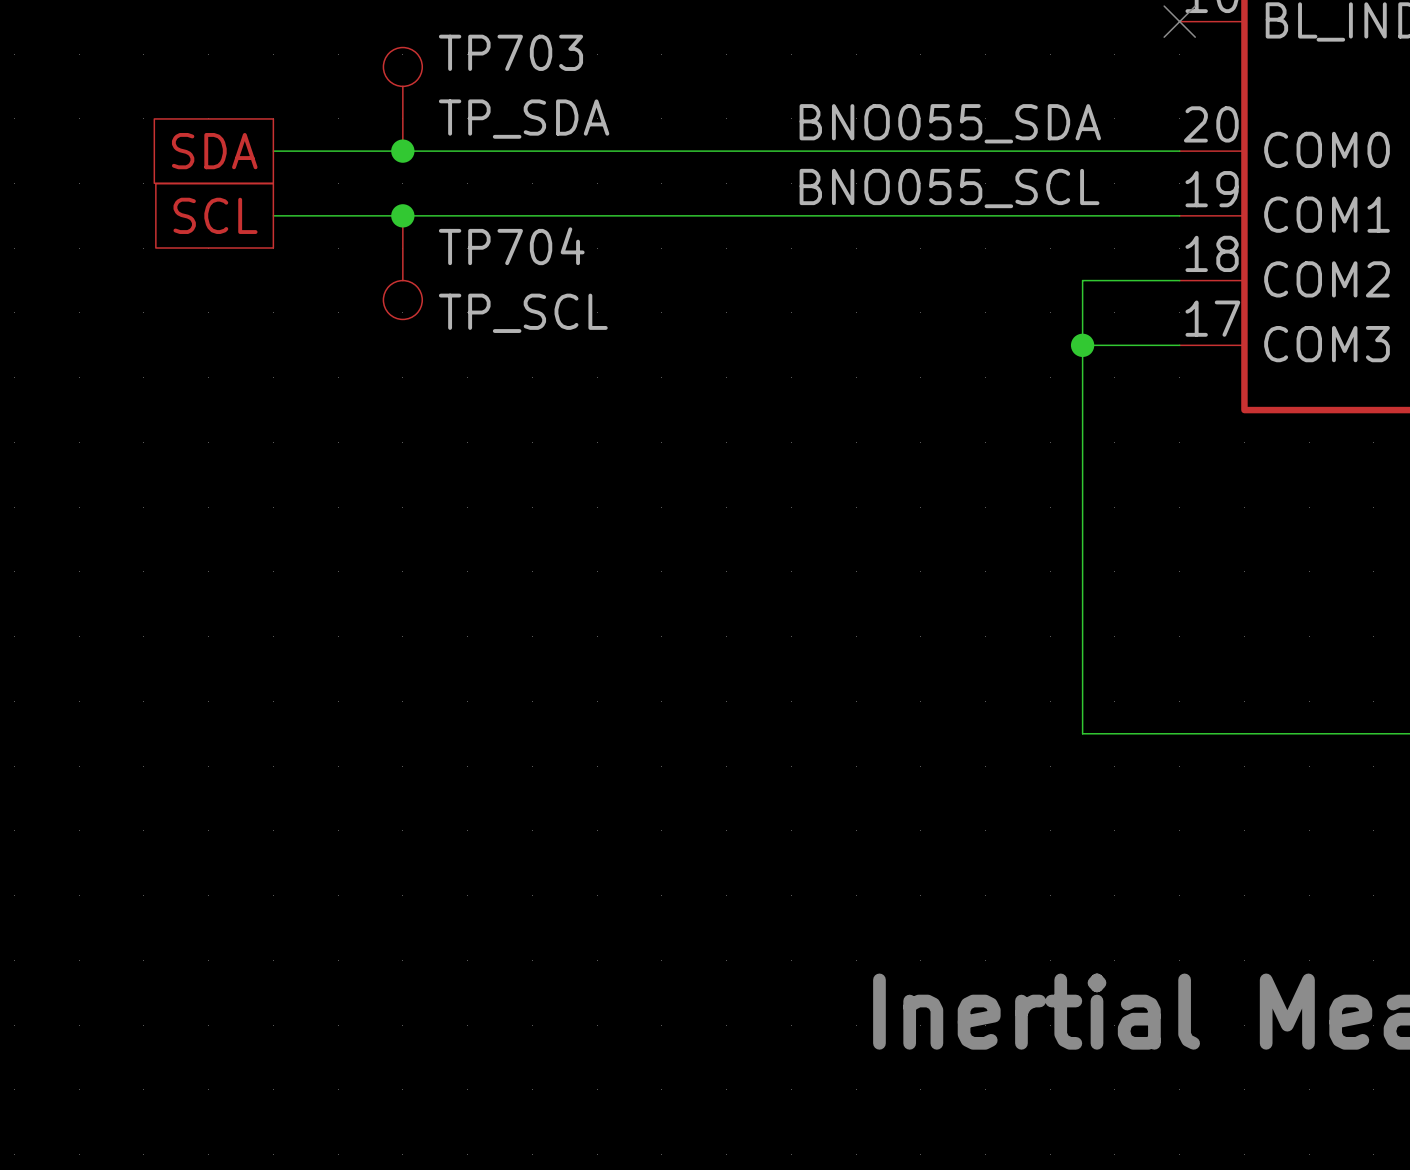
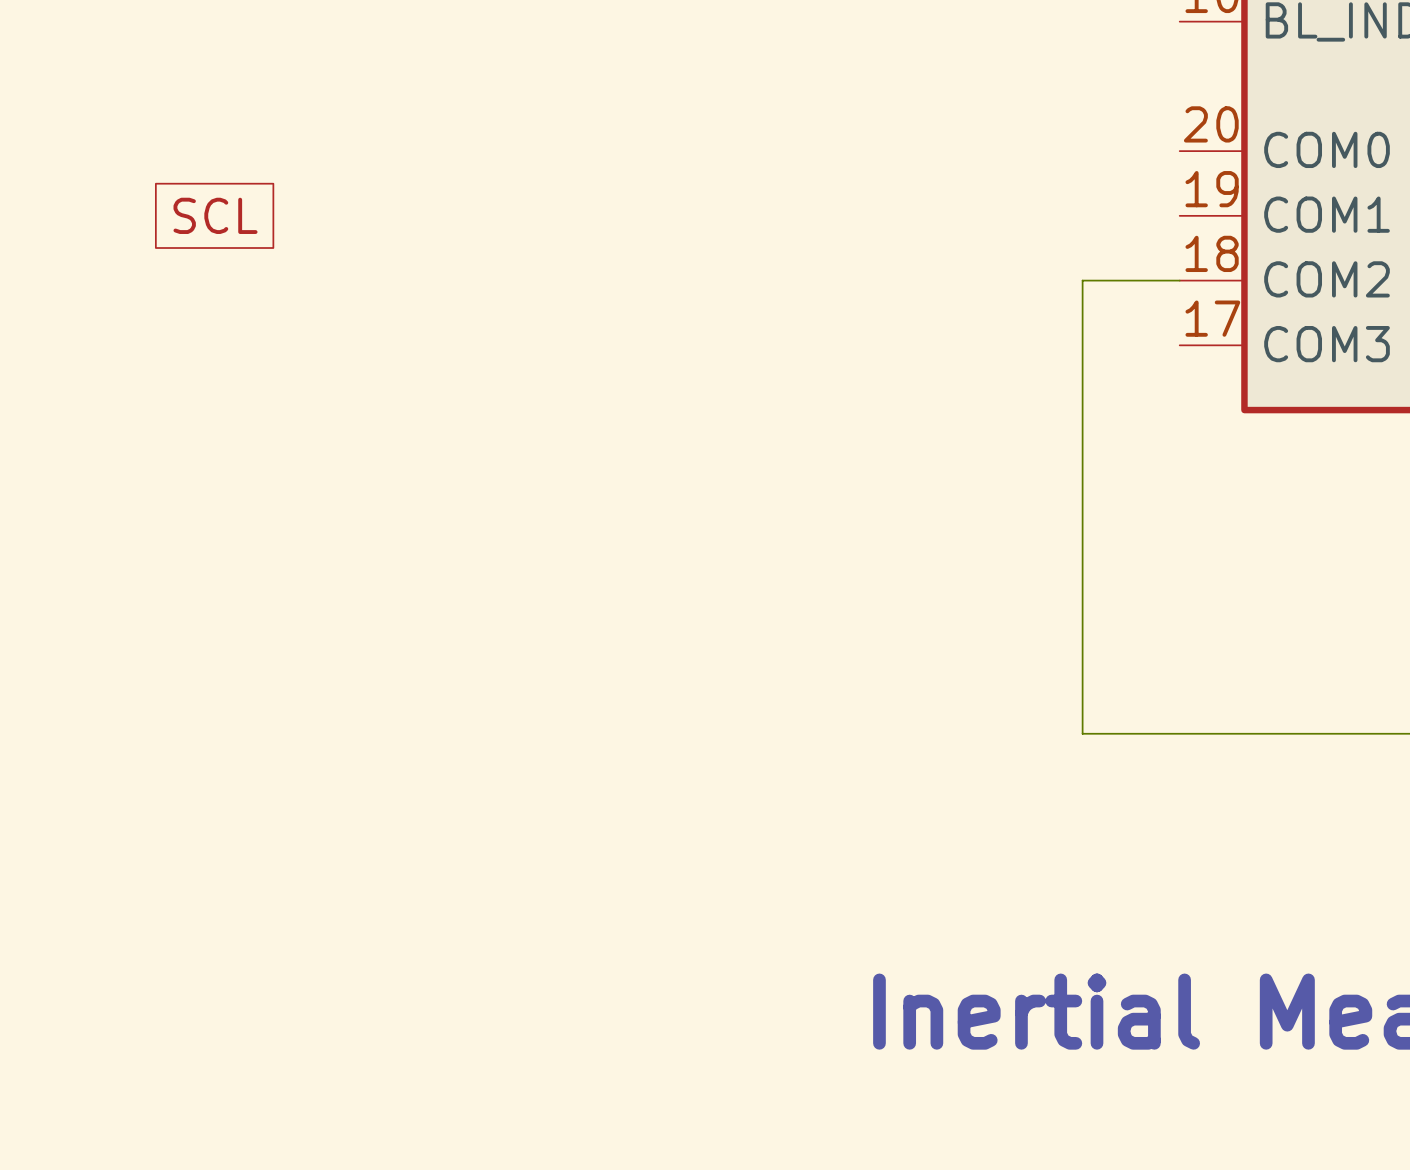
no-connect mark: (1179, 21) -> none
TP703: TP_SDA (402, 99) -> none
label: BNO055_SDA (950, 123) -> none
global label: SDA (214, 151) -> none
wire: (273, 151) (1179, 151) -> none
junction: (402, 151) -> none
label: BNO055_SCL (949, 188) -> none
wire: (273, 215) (1179, 215) -> none
junction: (402, 215) -> none
TP704: TP_SCL (402, 267) -> none
wire: (1082, 345) (1179, 345) -> none
junction: (1082, 345) -> none

